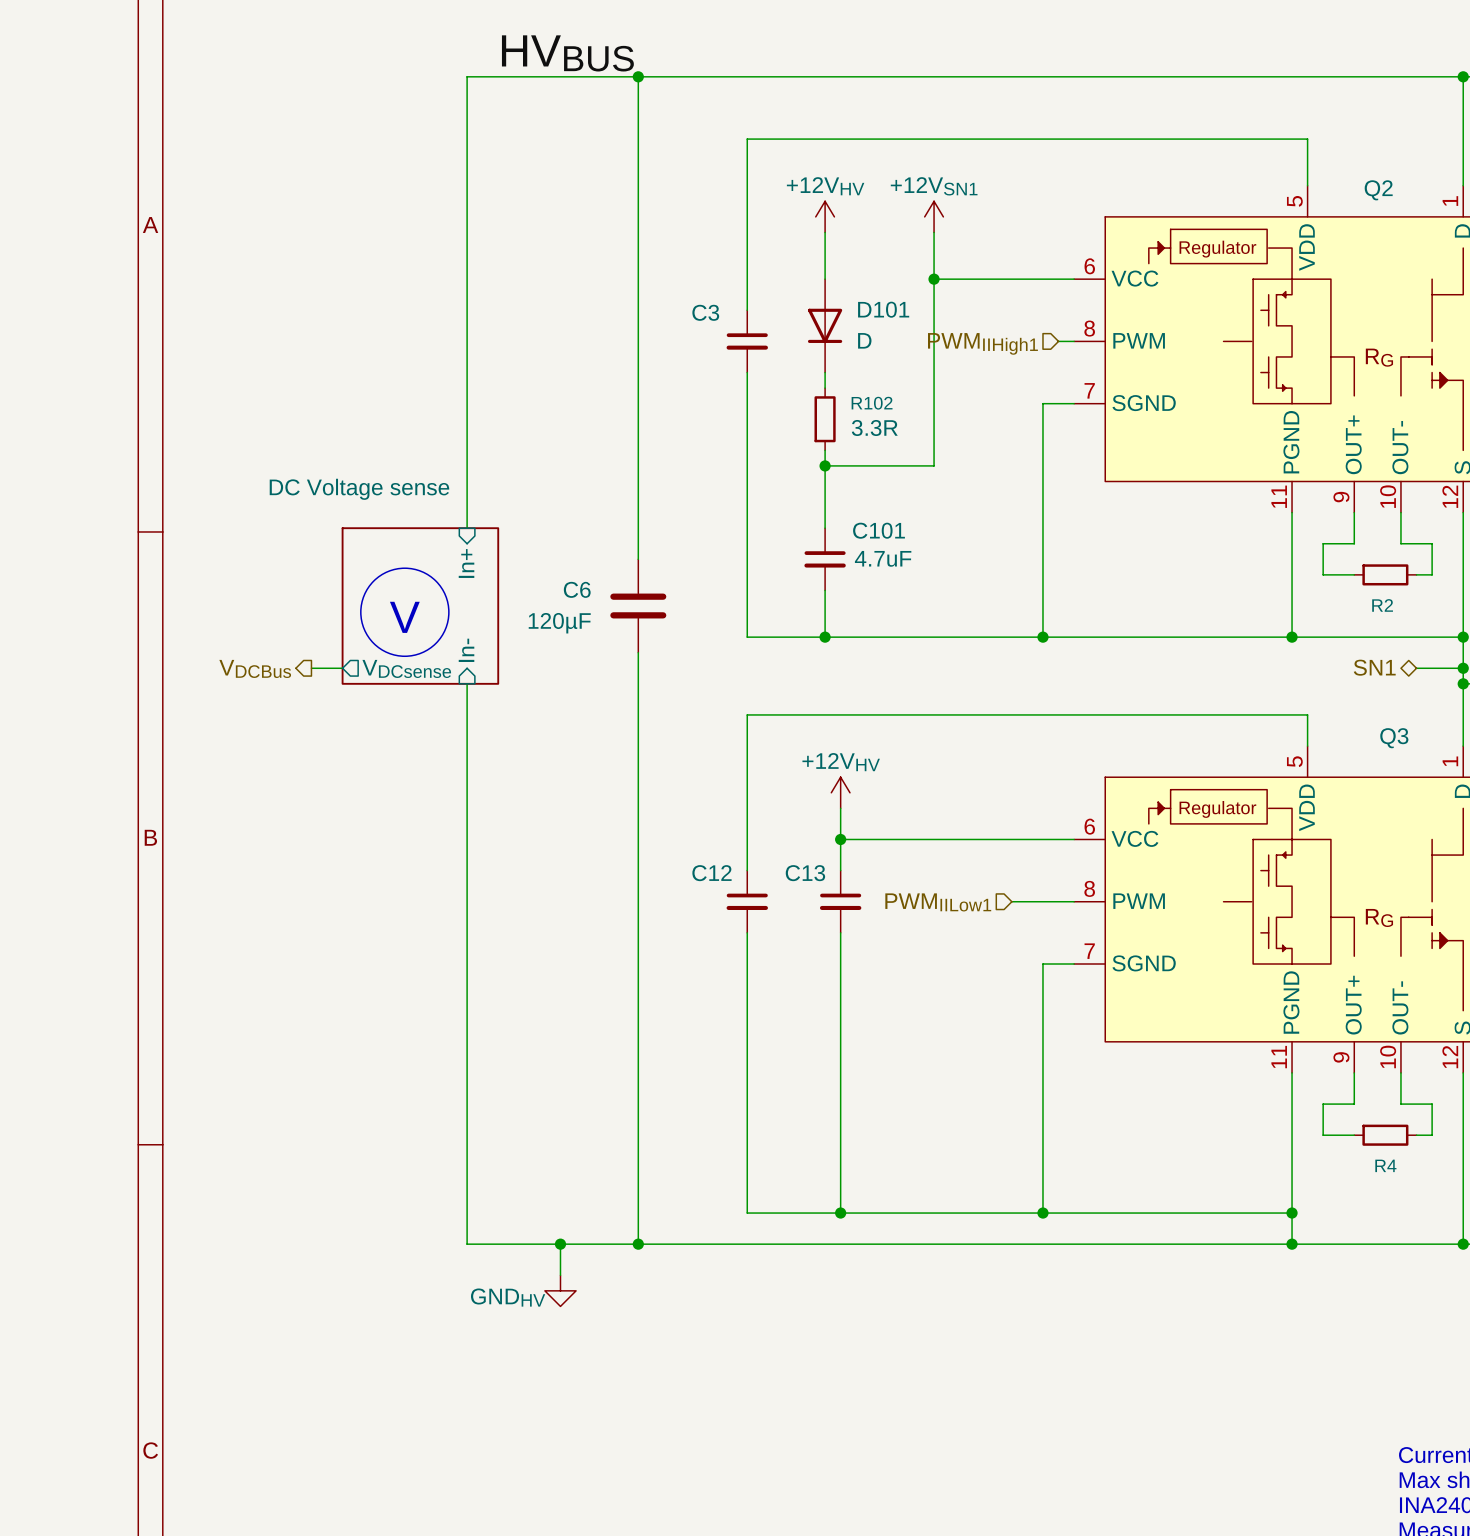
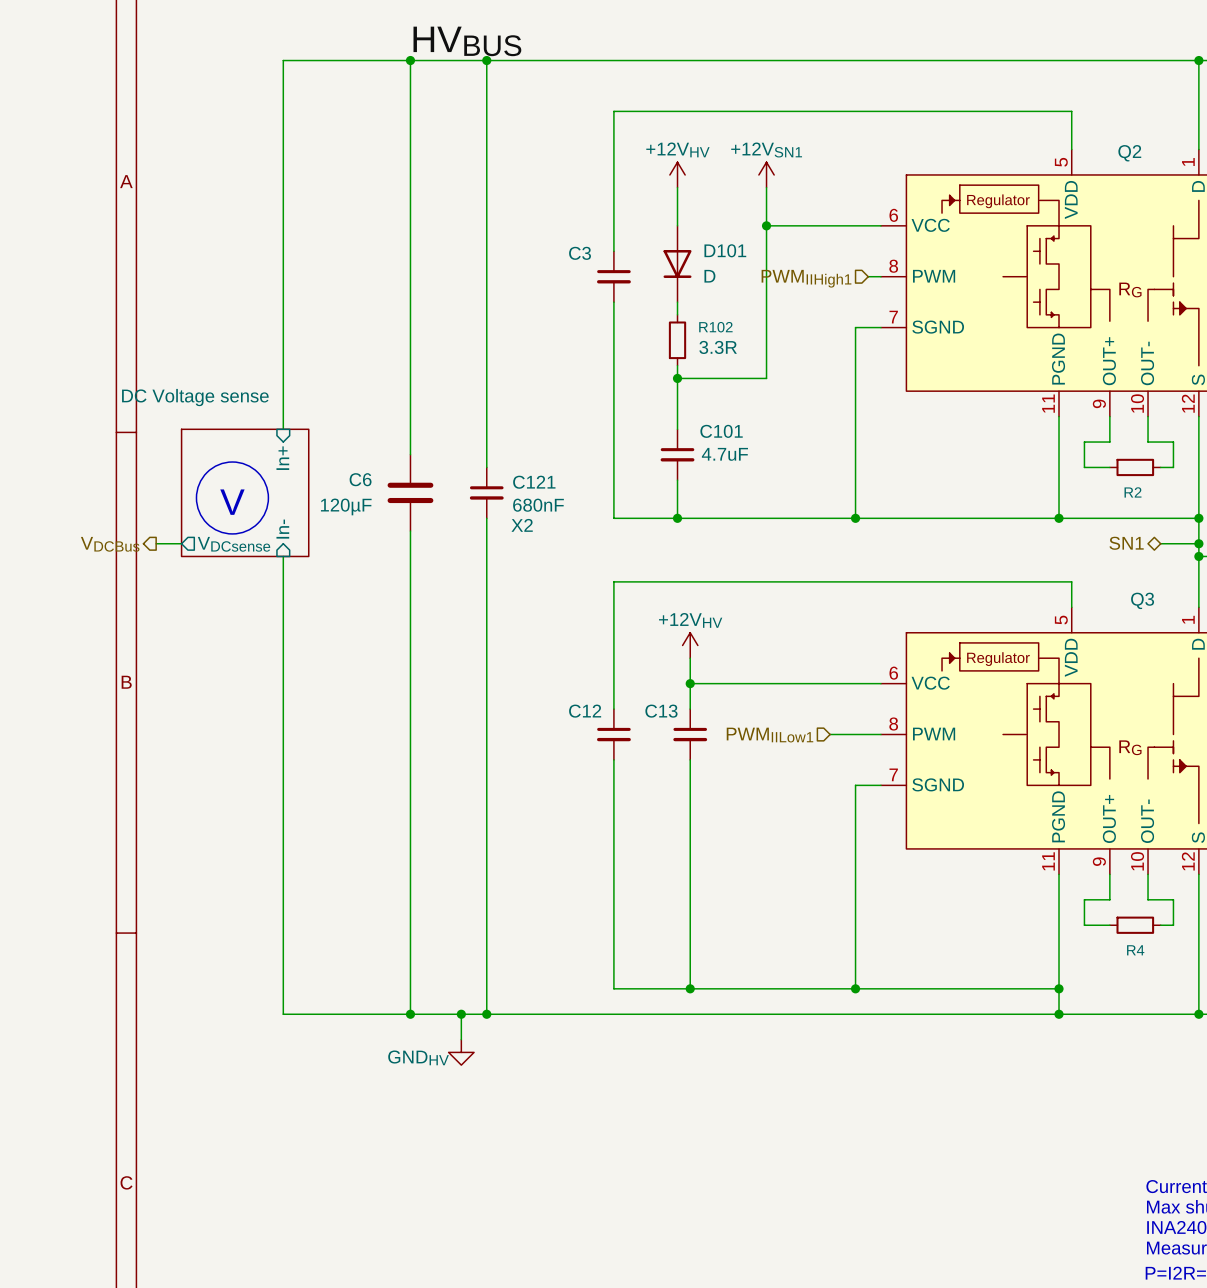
wire: (467, 76) (467, 528) -> (385, 60) (283, 60) (283, 429)
junction: none -> (410, 60)
wire: none -> (486, 60) (486, 467)
wire: (638, 76) (638, 559) -> (410, 60) (410, 454)
junction position: (638, 76) -> (486, 60)
sheet pin position: In+ (466, 563) -> In+ (282, 458)
sheet DC Voltage sense position: (420, 606) -> (245, 492)
C121: none -> 680nF (486, 492)
C6 position: (638, 606) -> (410, 492)
drawing position: (404, 612) -> (232, 497)
text position: V (404, 617) -> V (232, 502)
wire: none -> (486, 518) (486, 1014)
sheet pin position: In- (466, 650) -> In- (282, 529)
wire: (638, 652) (638, 1244) -> (410, 531) (410, 1014)
hierarchical label position: VDCBus (255, 668) -> VDCBus (110, 544)
wire: (311, 668) (342, 668) -> (156, 543) (181, 543)
sheet pin position: VDCsense (406, 668) -> VDCsense (234, 544)
wire: (467, 683) (467, 1244) -> (283, 556) (283, 1014) (385, 1014)
junction: none -> (410, 1014)
junction position: (638, 1244) -> (486, 1014)

